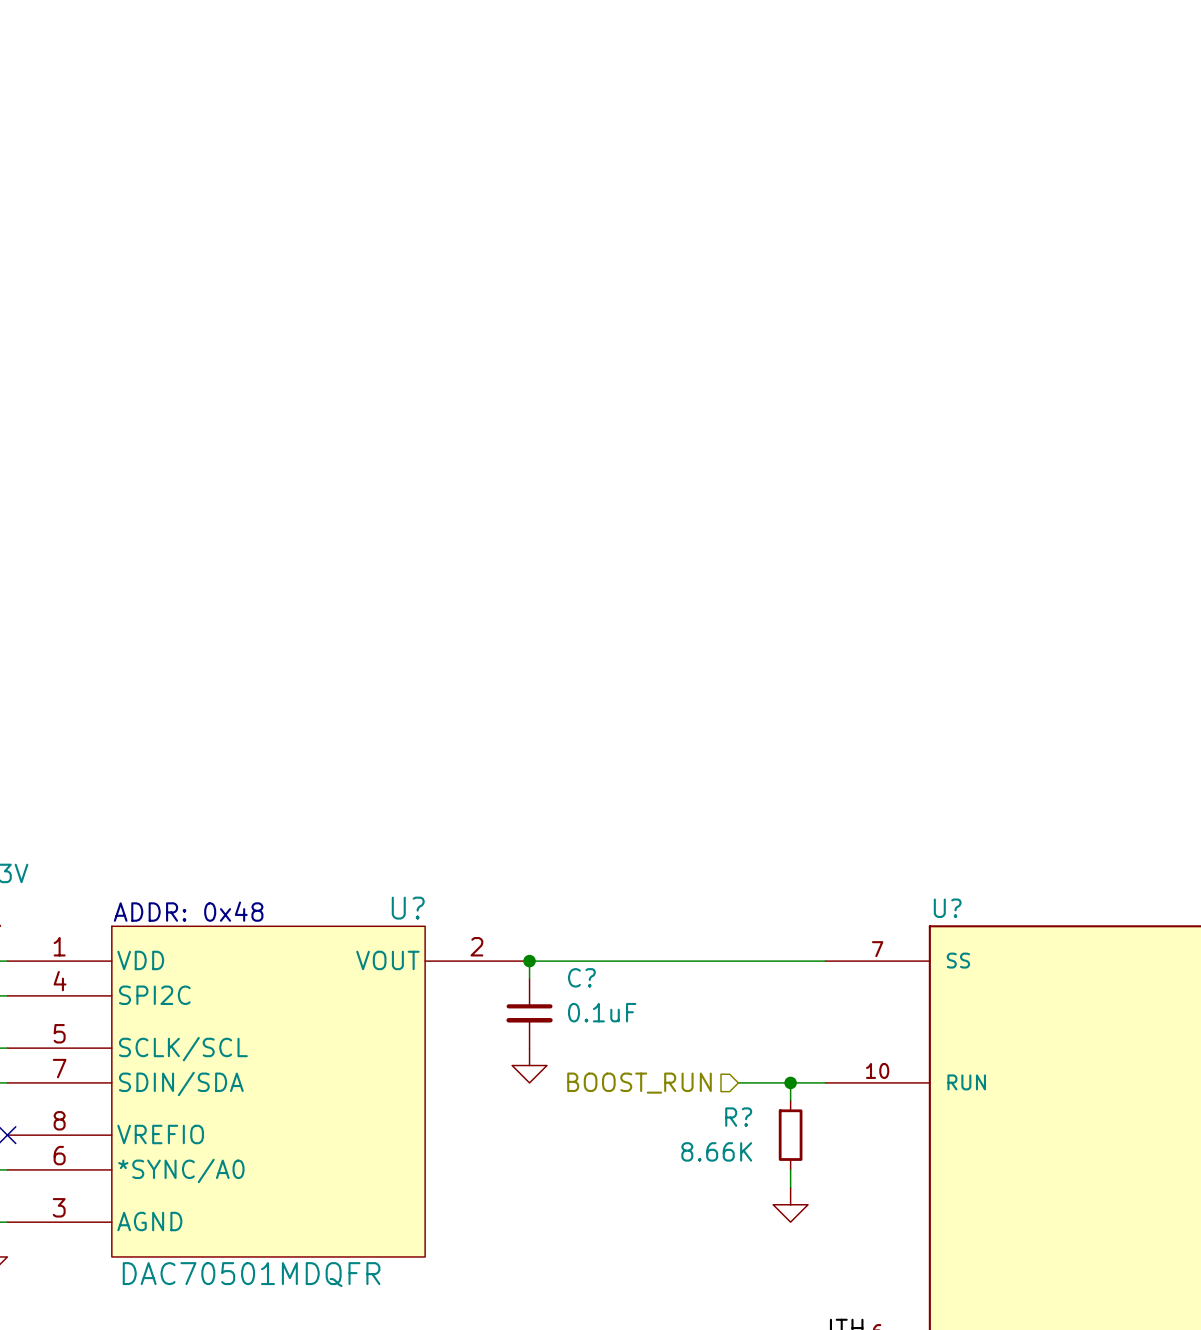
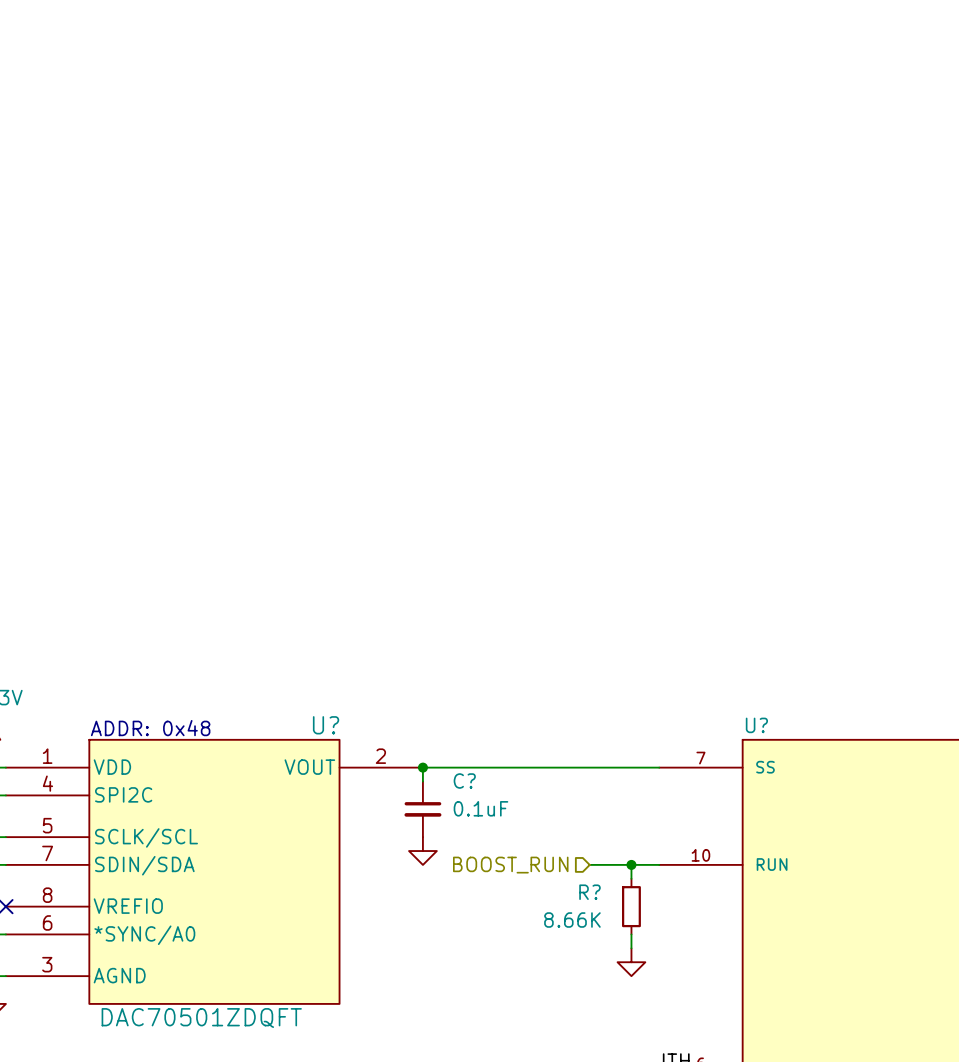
U? value: DAC70501MDQFR (251, 1274) -> DAC70501ZDQFT (201, 1018)

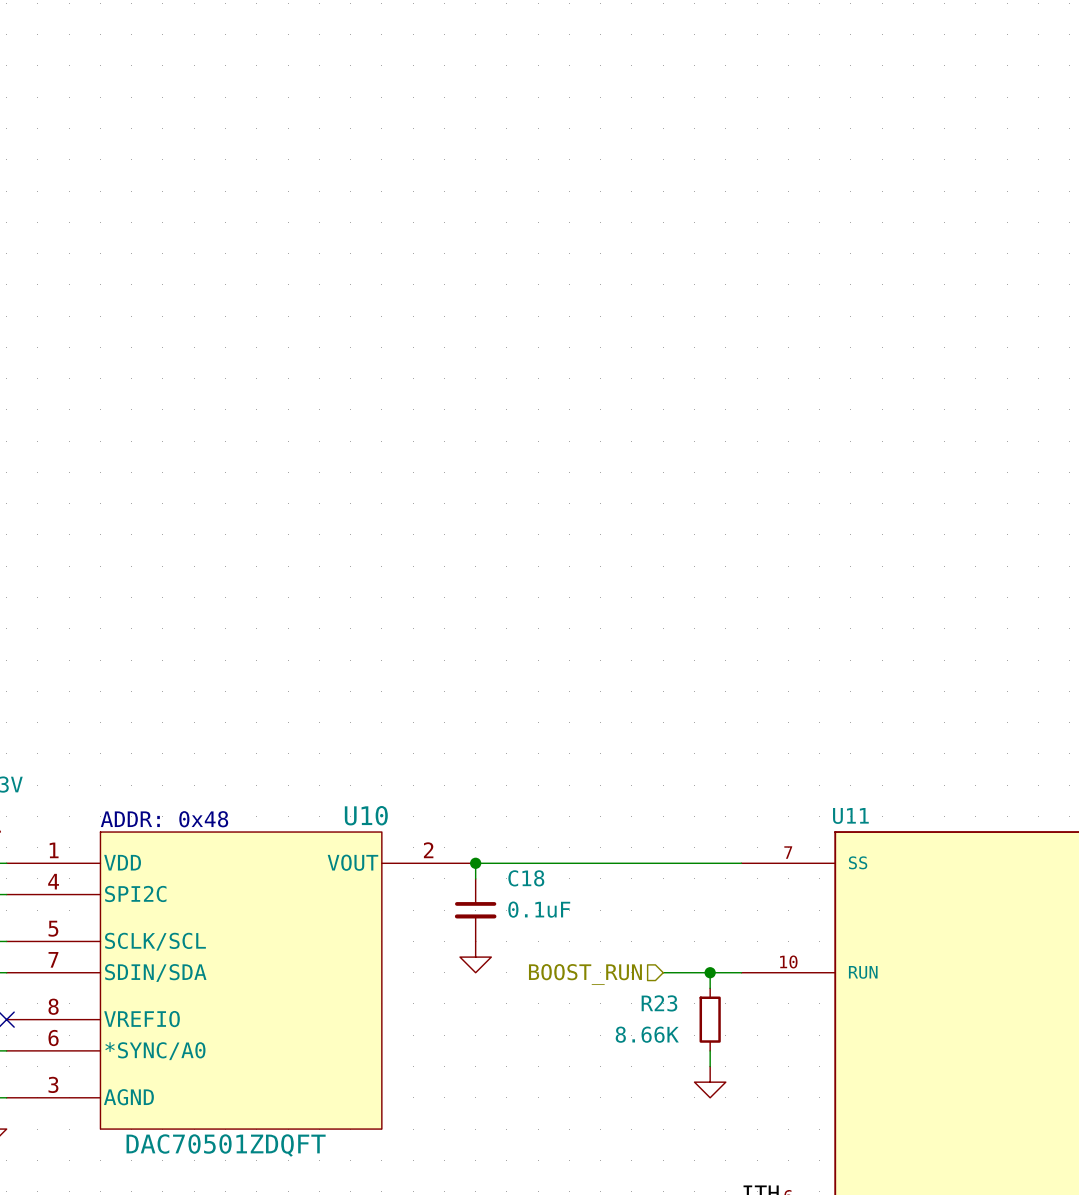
U? name: U? (326, 725) -> U10 (366, 815)
U? name: U? (756, 725) -> U11 (850, 815)
C? name: C? (464, 781) -> C18 (526, 878)
R? name: R? (589, 892) -> R23 (659, 1003)

